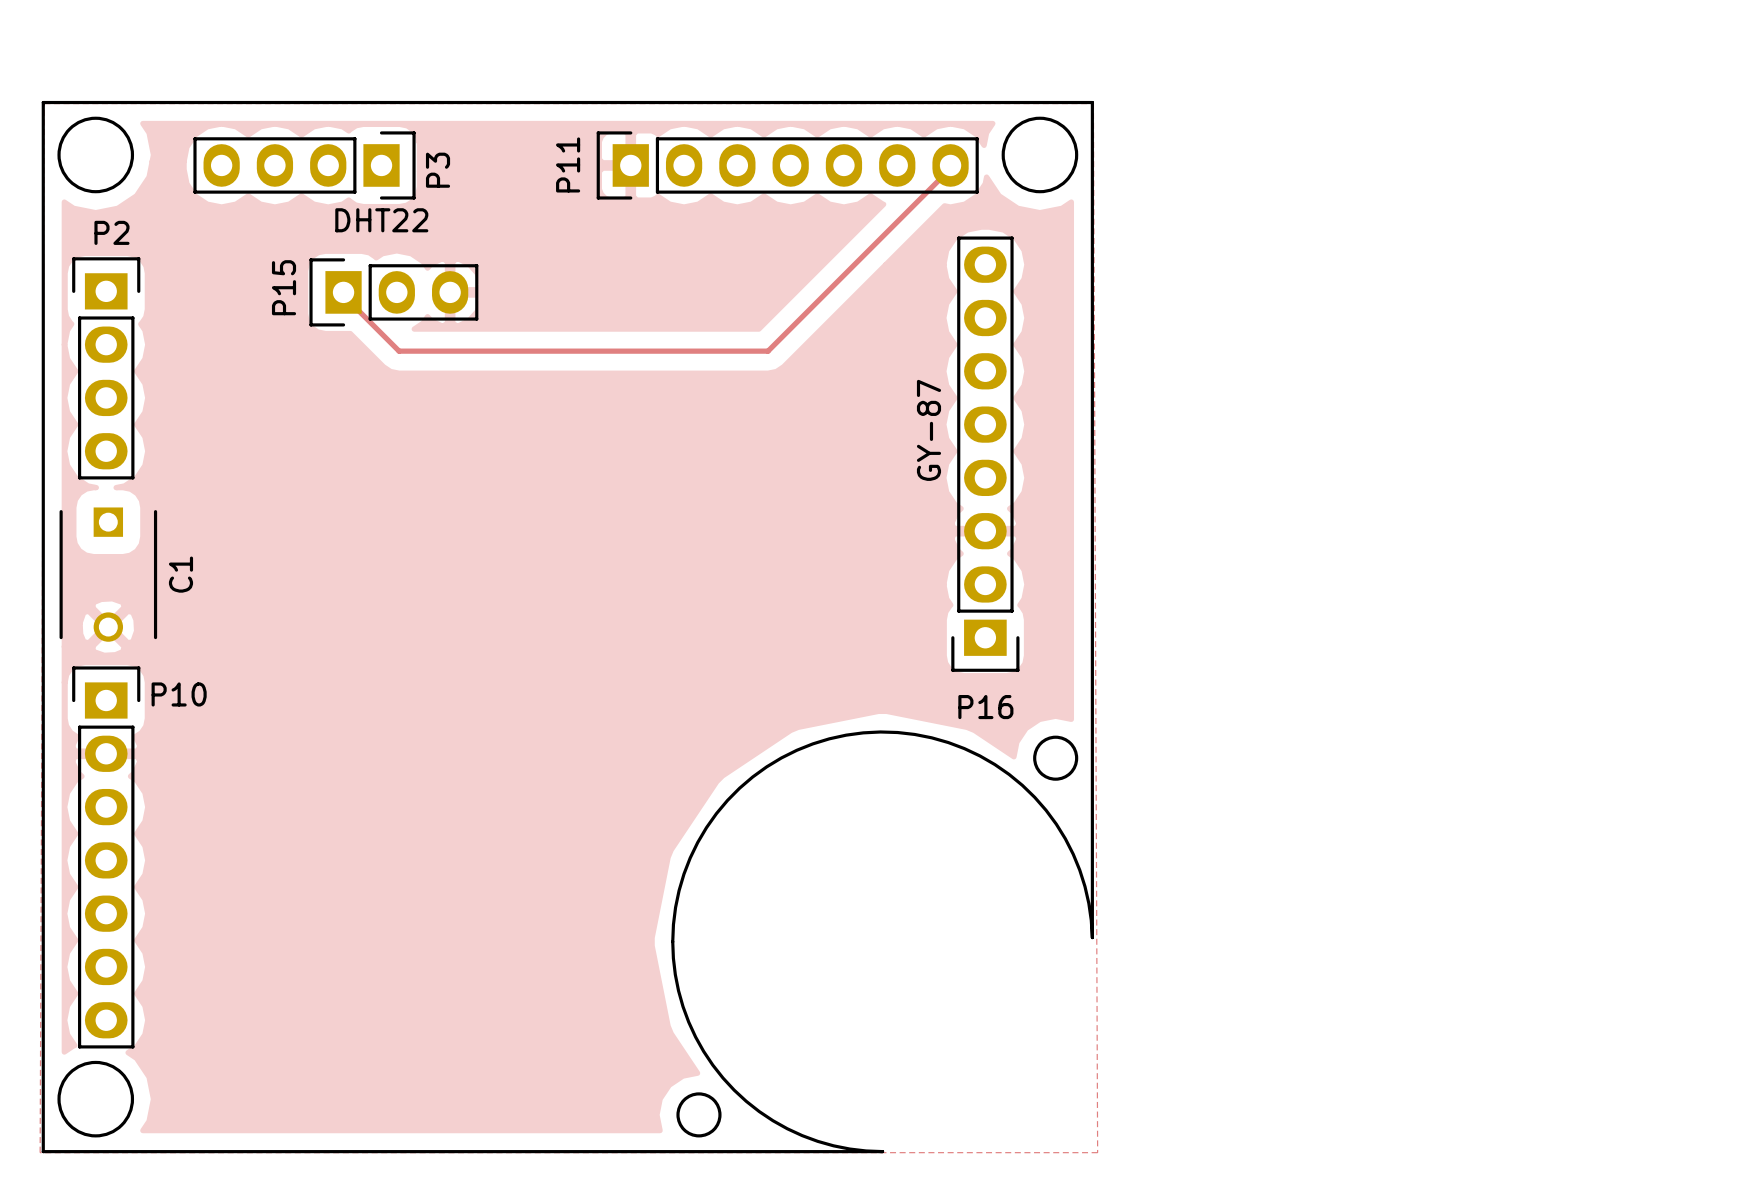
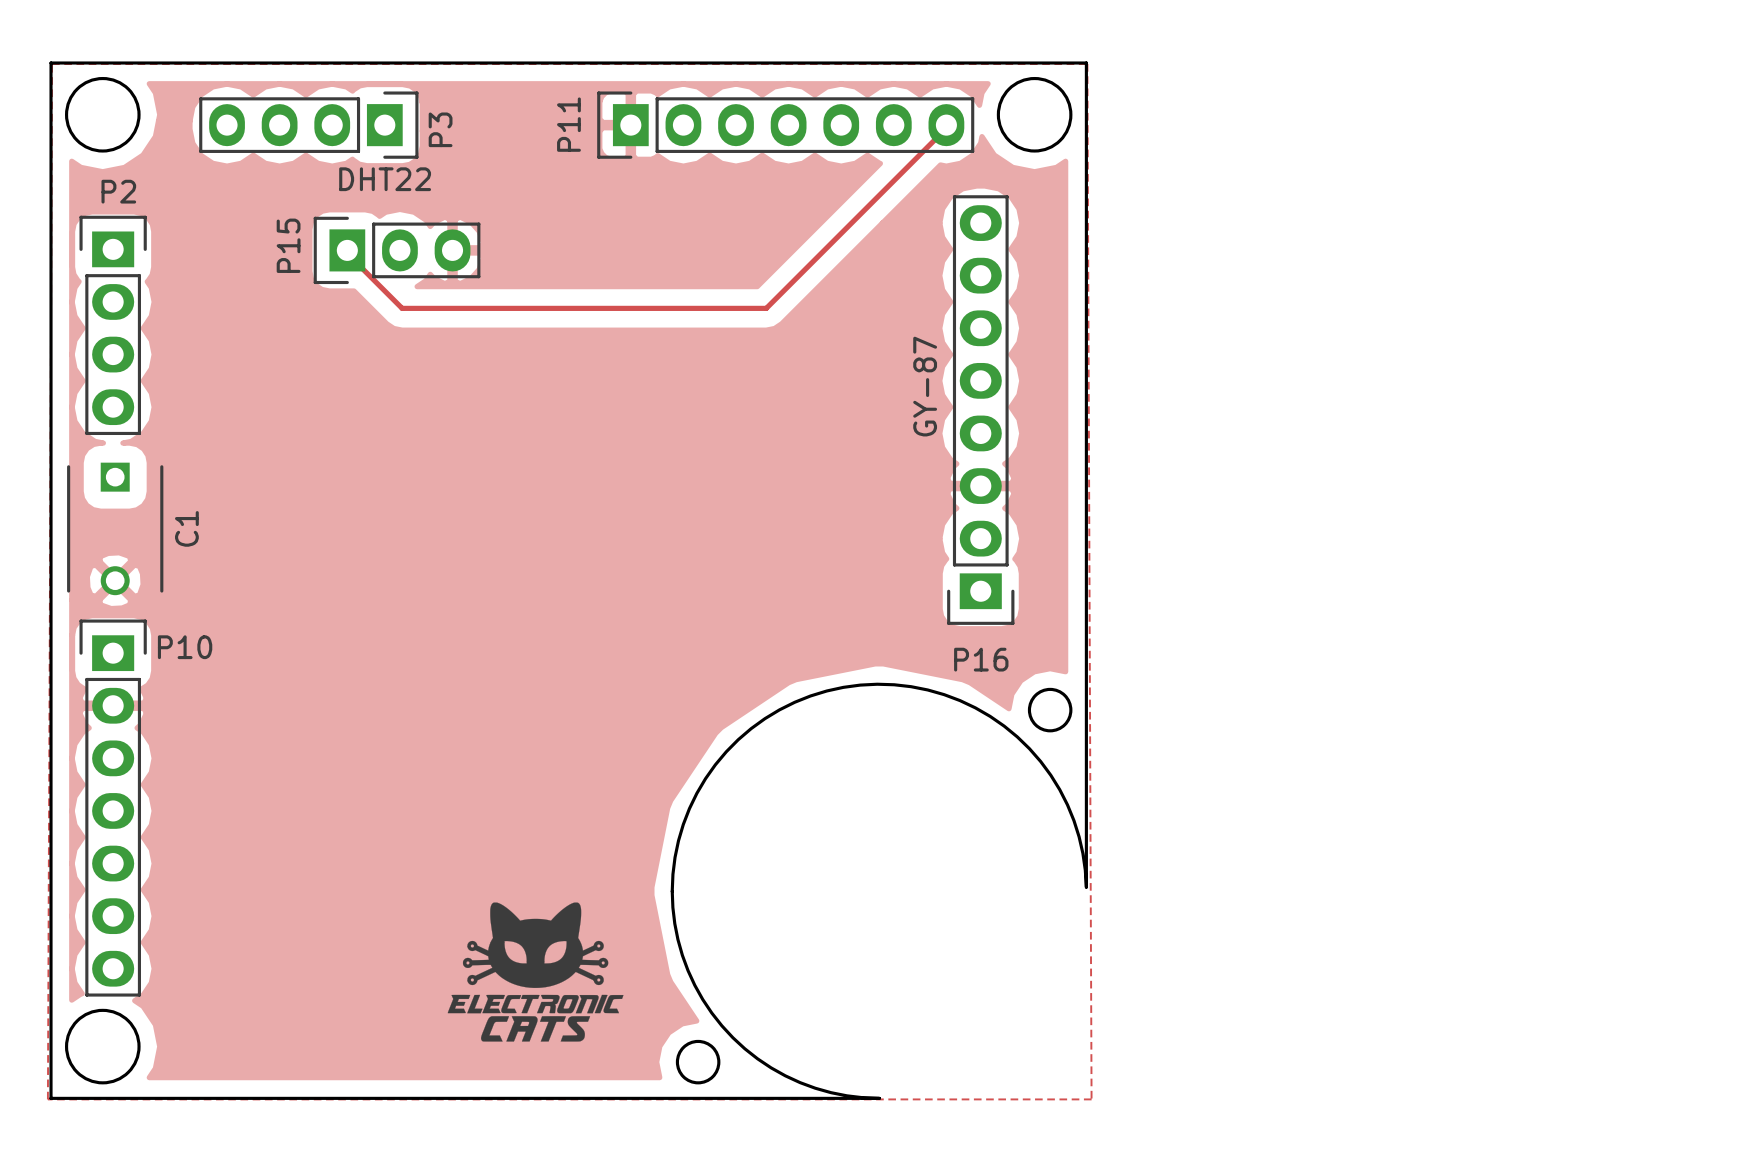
drawing: none -> [447, 902, 624, 1042]

